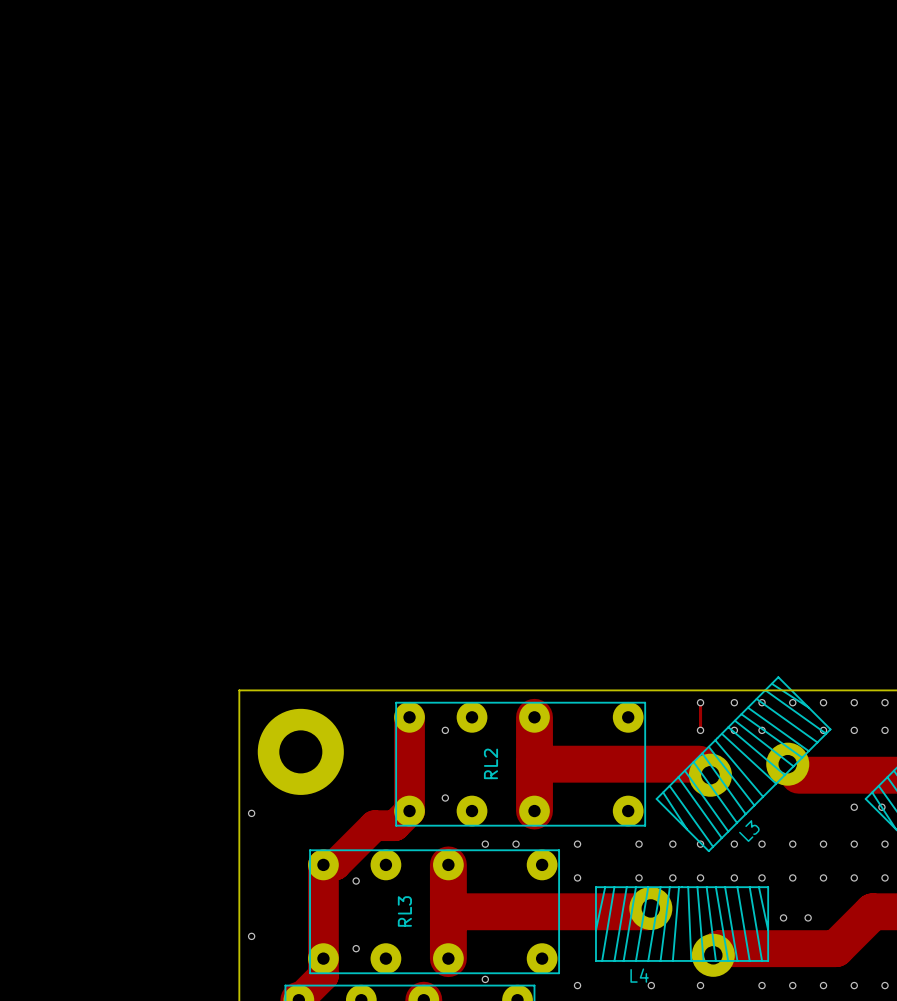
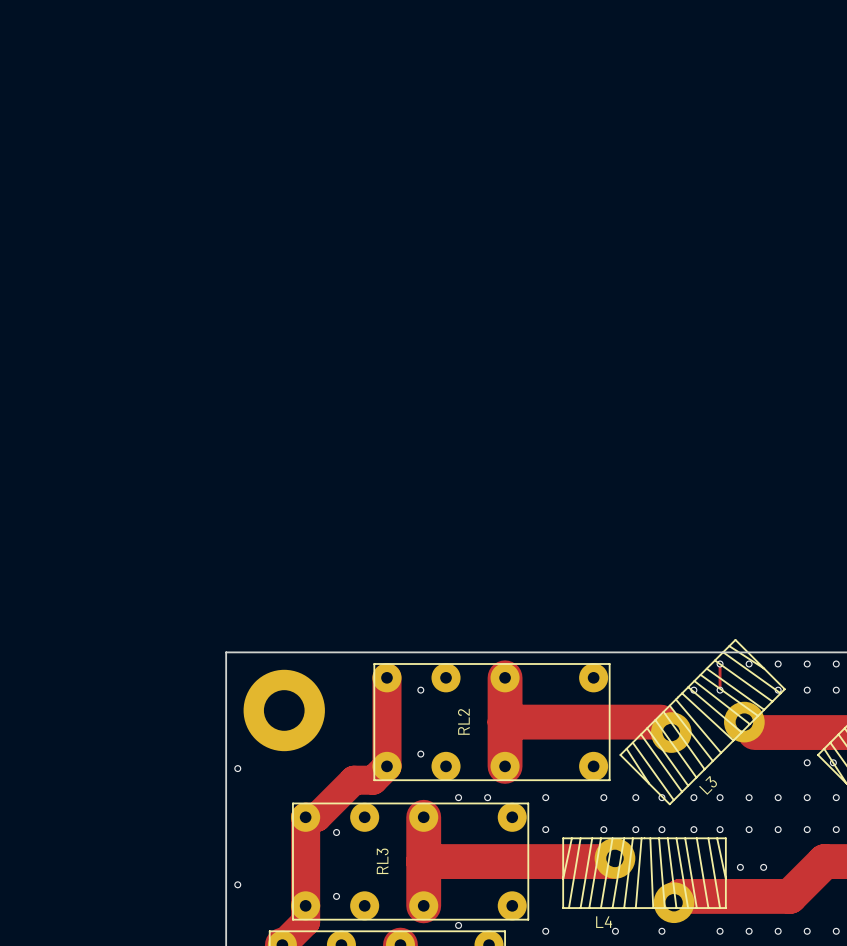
track: (700, 702) (700, 730) -> (720, 664) (720, 690)
via: (700, 702) -> none
via: (734, 702) -> none
via: (700, 730) -> none

